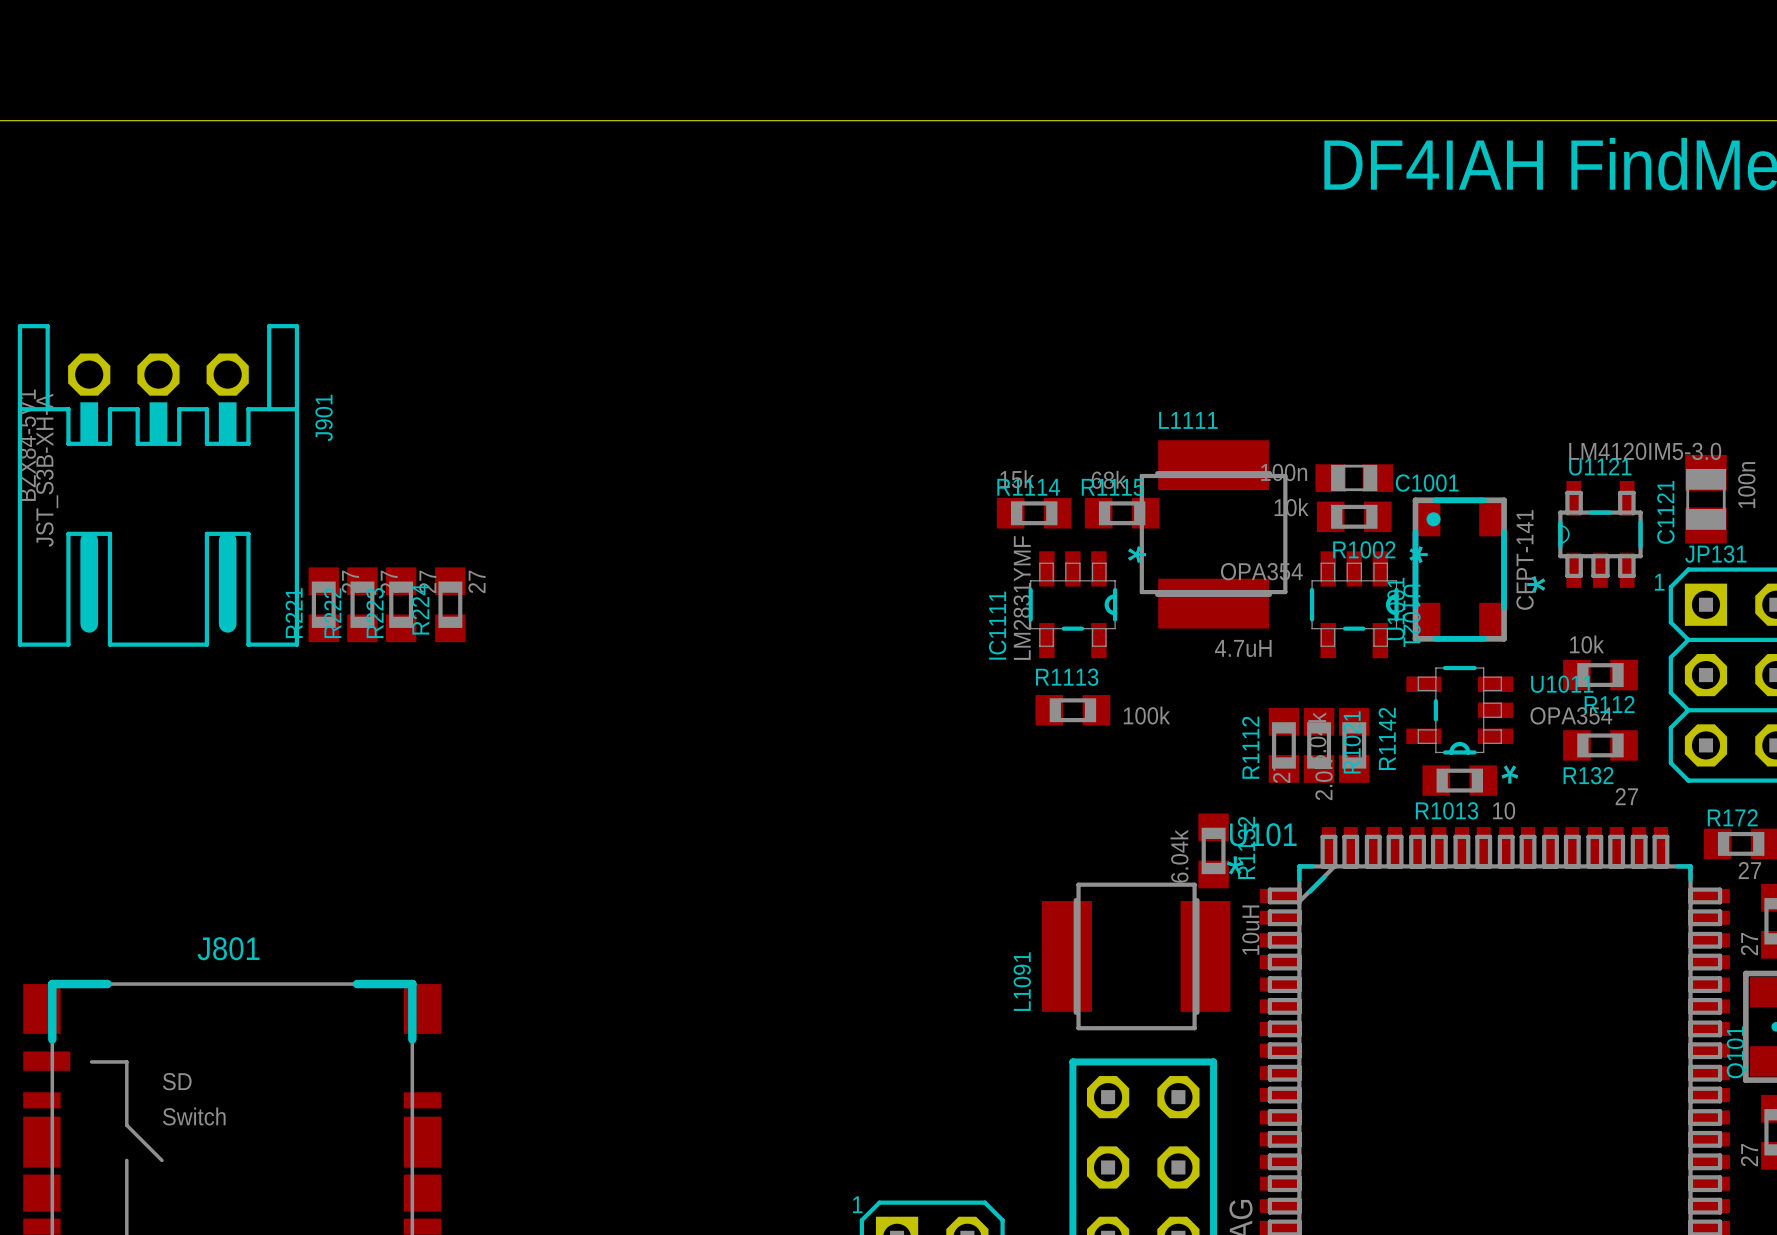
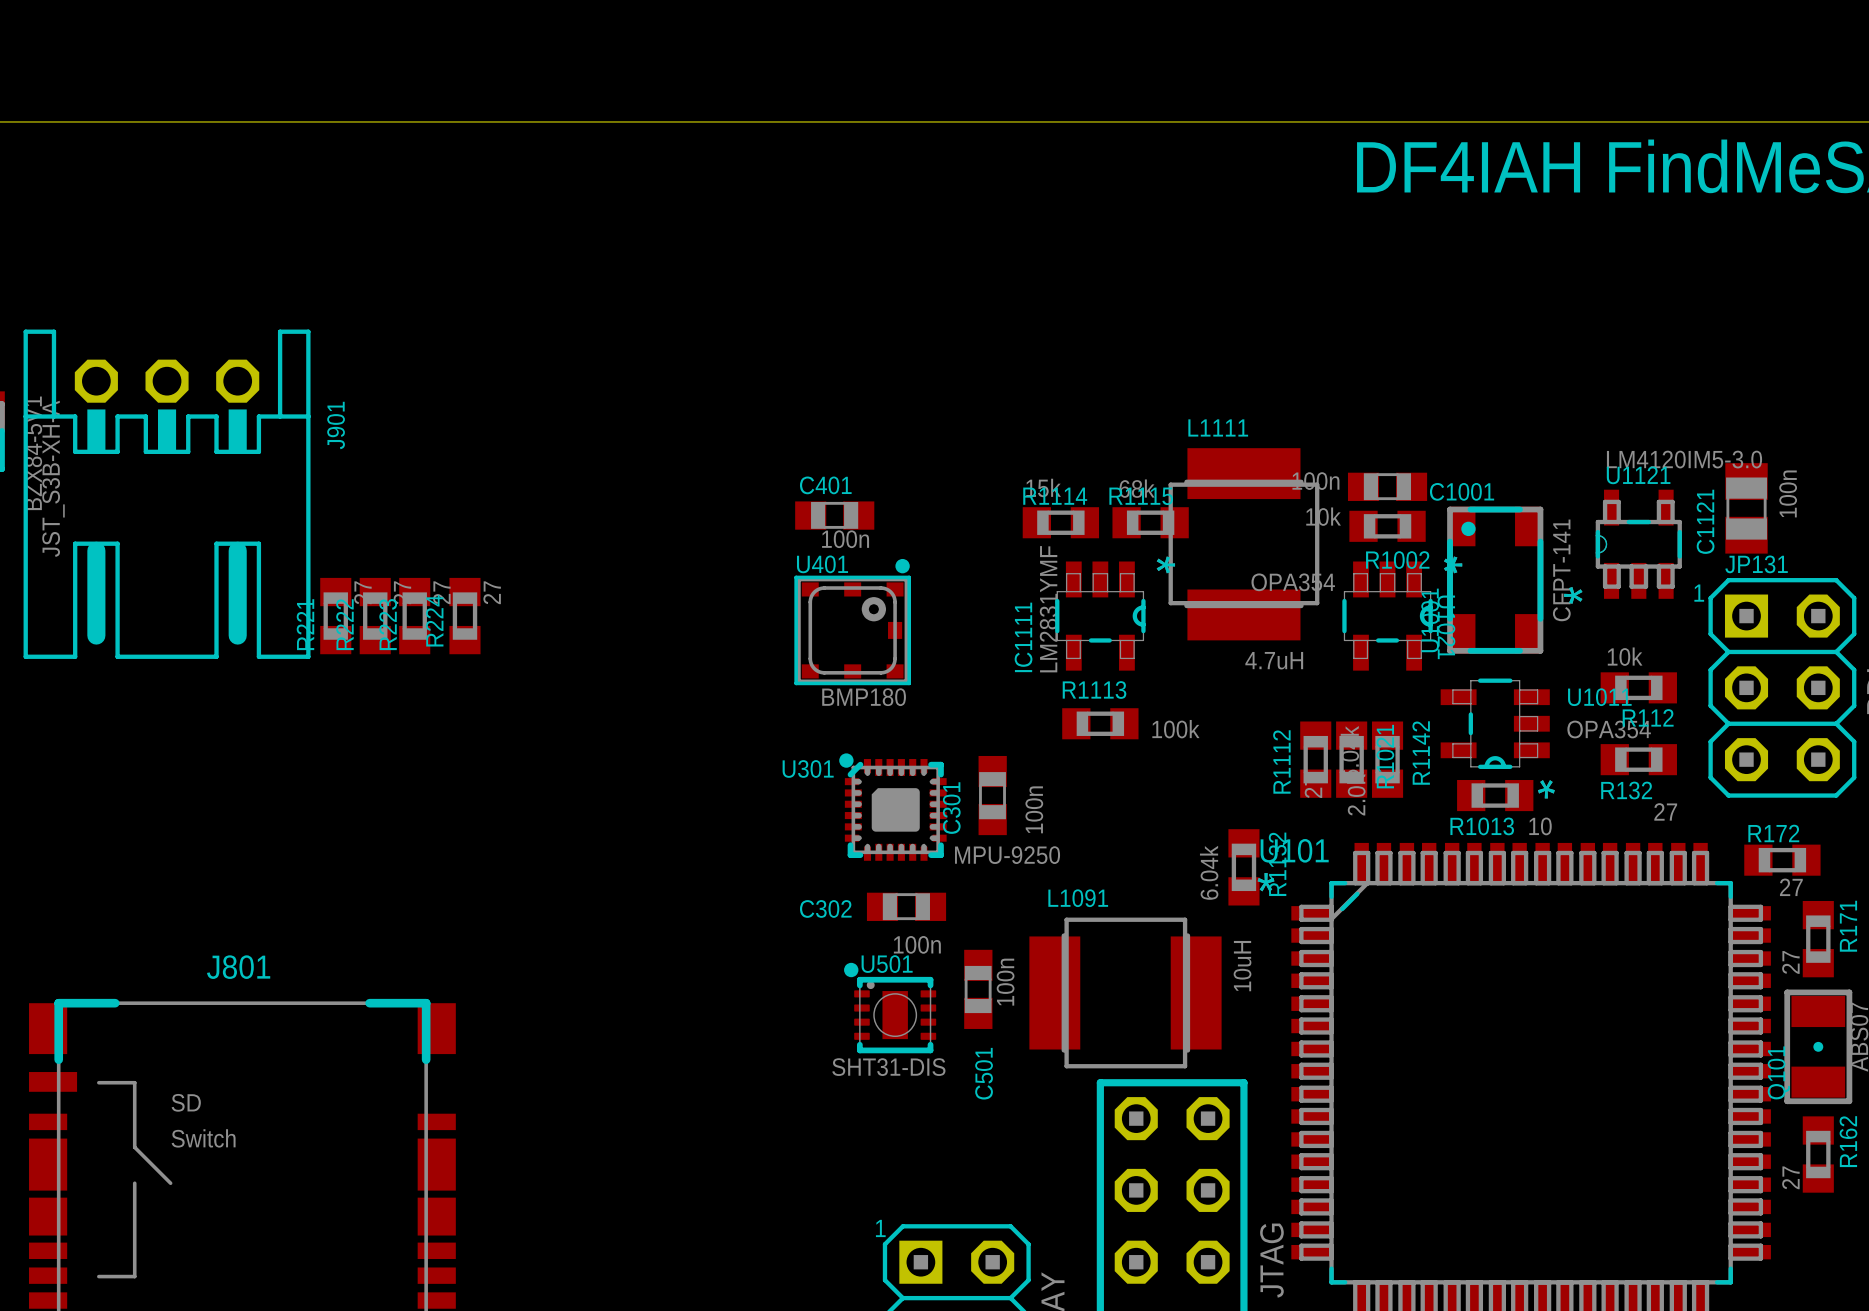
C401: none -> 100n (834, 515)
U401: none -> BMP180 (852, 622)
C301: none -> 100n (992, 795)
U301: none -> MPU-9250 (892, 807)
C302: none -> 100n (906, 906)
L1091 position: (1136, 956) -> (1125, 992)
C501: none -> 100n (978, 989)
L1091 name rotation: 0° (1022, 981) -> 90° clockwise (1078, 898)
L1091 name position: L1091 (1022, 981) -> L1091 (1078, 898)
U501: none -> SHT31-DIS (890, 1008)

